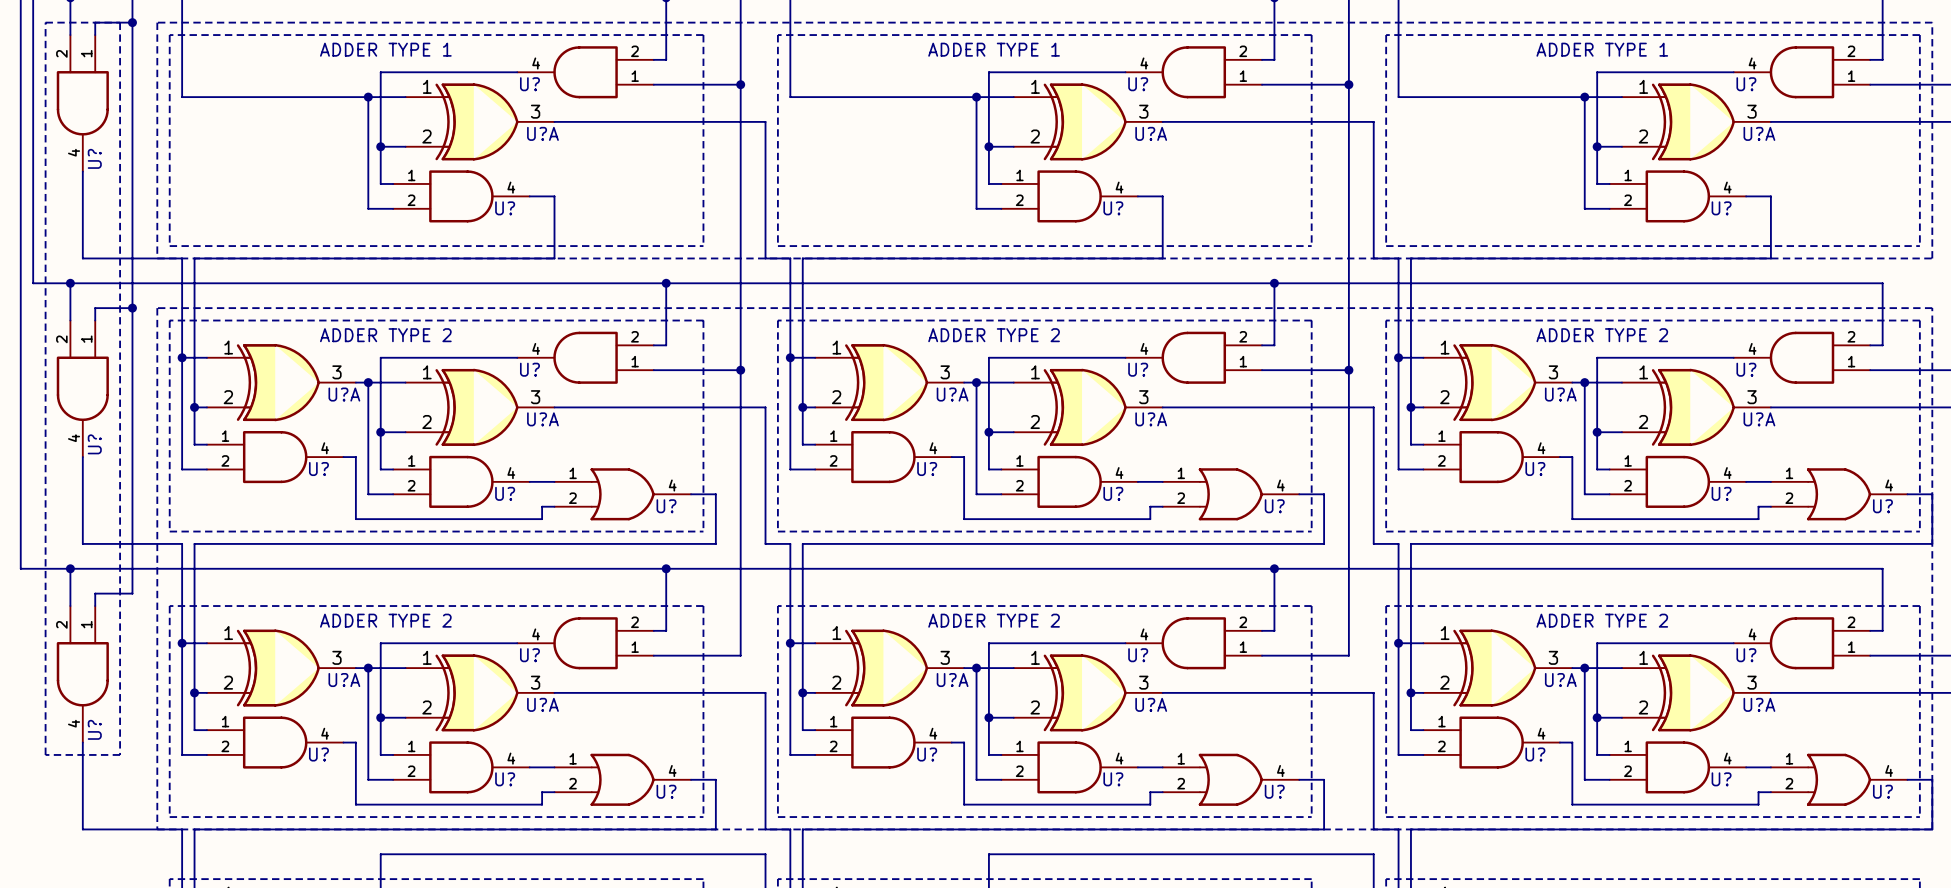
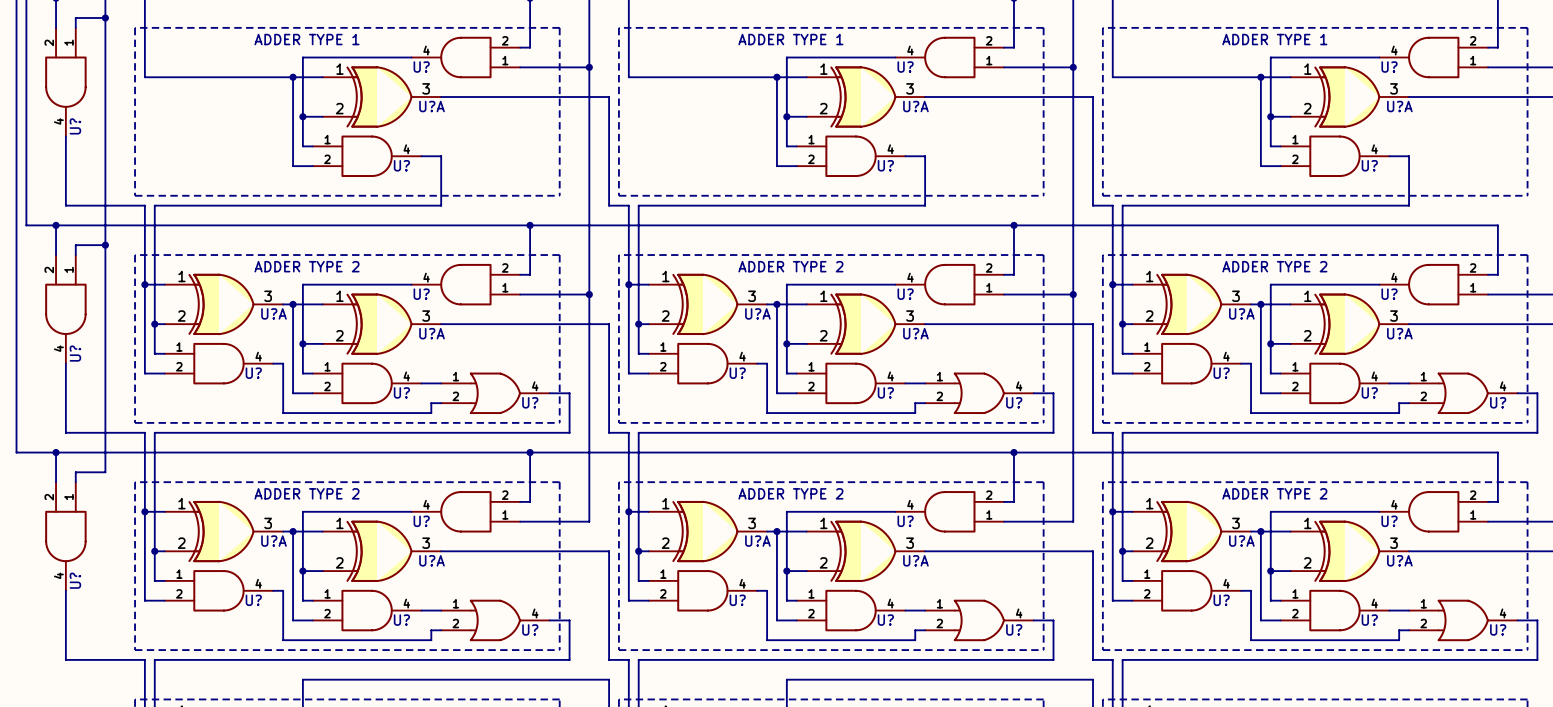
line: (45, 22) (120, 22) (120, 754) (45, 754) (45, 22) -> none
line: (157, 22) (157, 258) (1932, 258) (1932, 22) (157, 22) -> none
line: (157, 308) (157, 829) (1932, 829) (1932, 308) (157, 308) -> none

